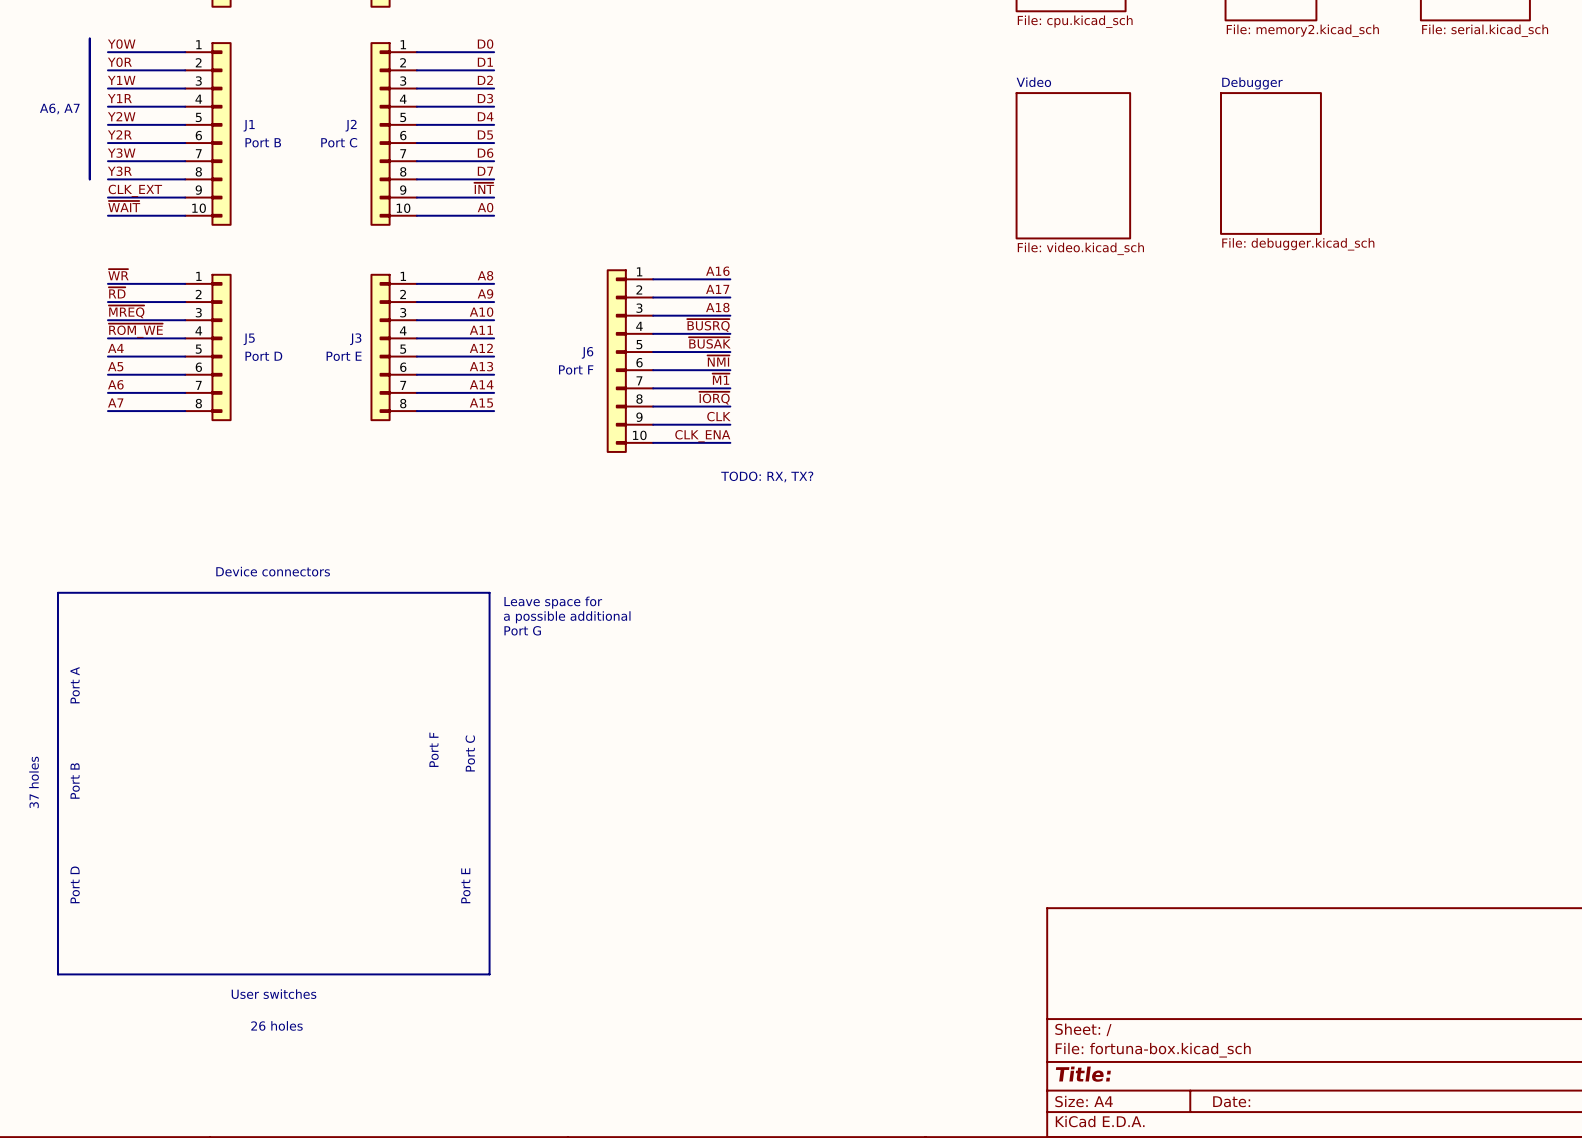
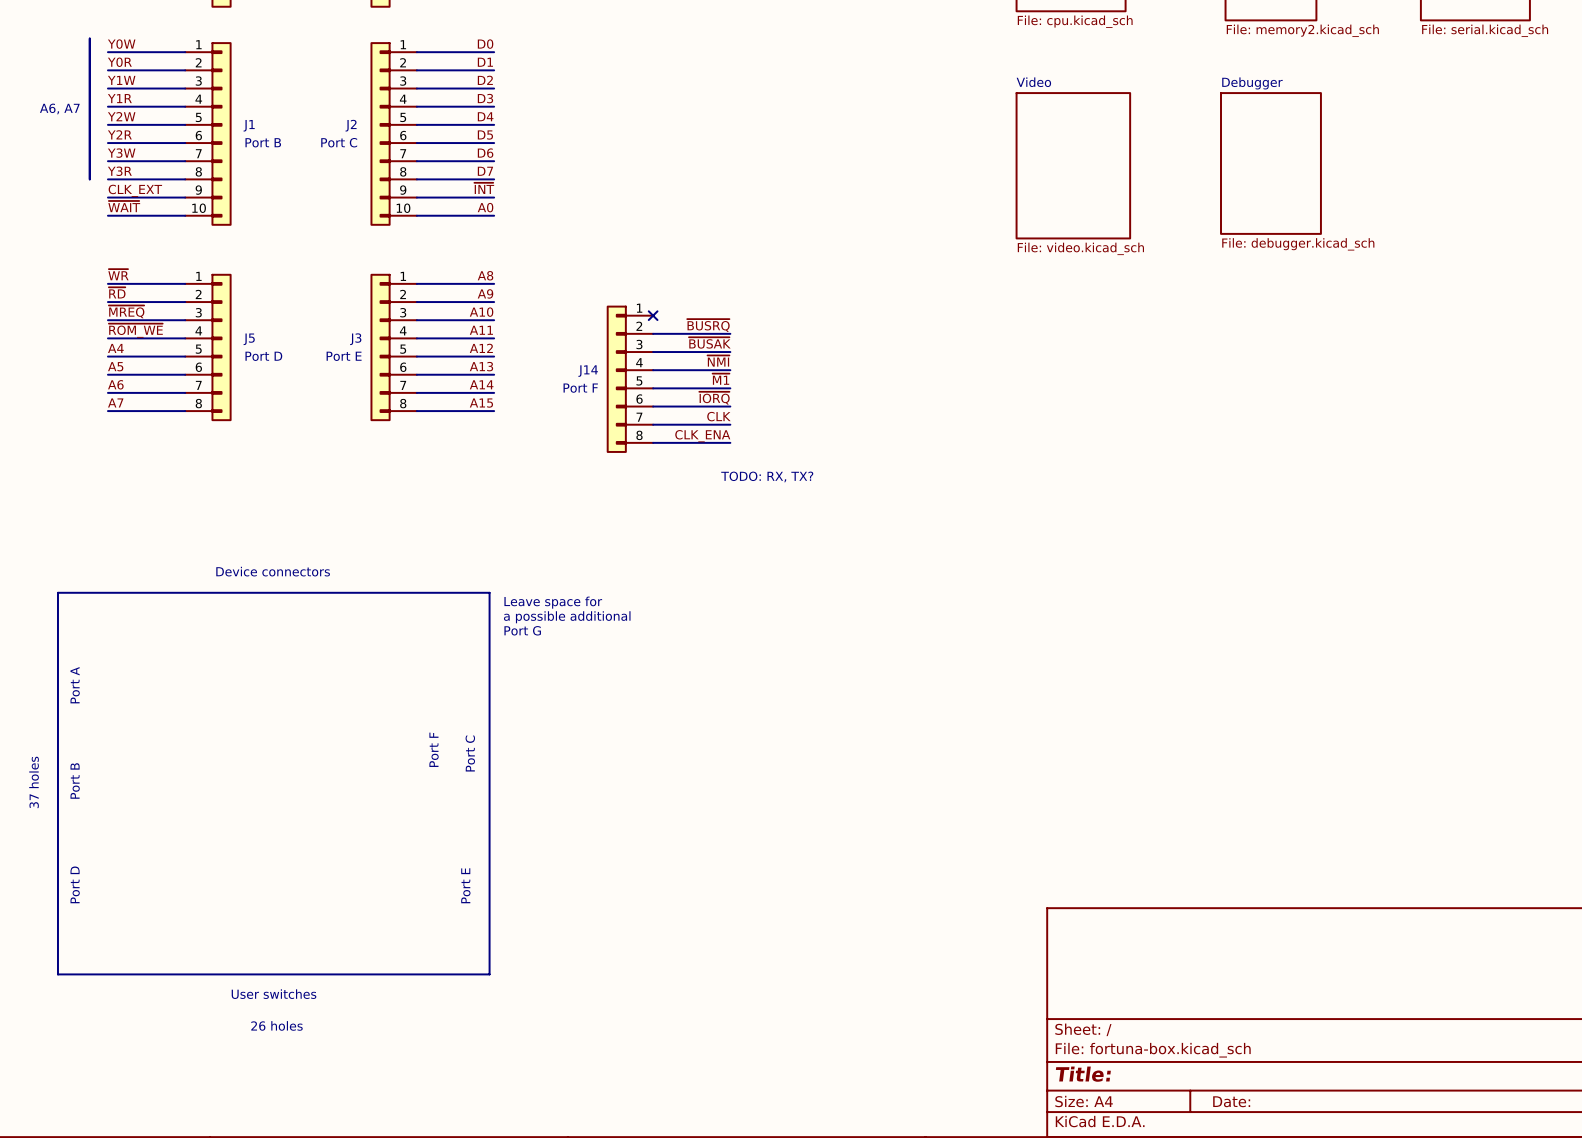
label: A16 (717, 271) -> none
wire: (653, 279) (730, 279) -> none
label: A17 (717, 289) -> none
wire: (653, 297) (730, 297) -> none
label: A18 (717, 307) -> none
wire: (653, 315) (730, 315) -> none
no-connect mark: none -> (653, 315)
J6: Port F (629, 361) -> none
J14: none -> Port F (629, 379)

